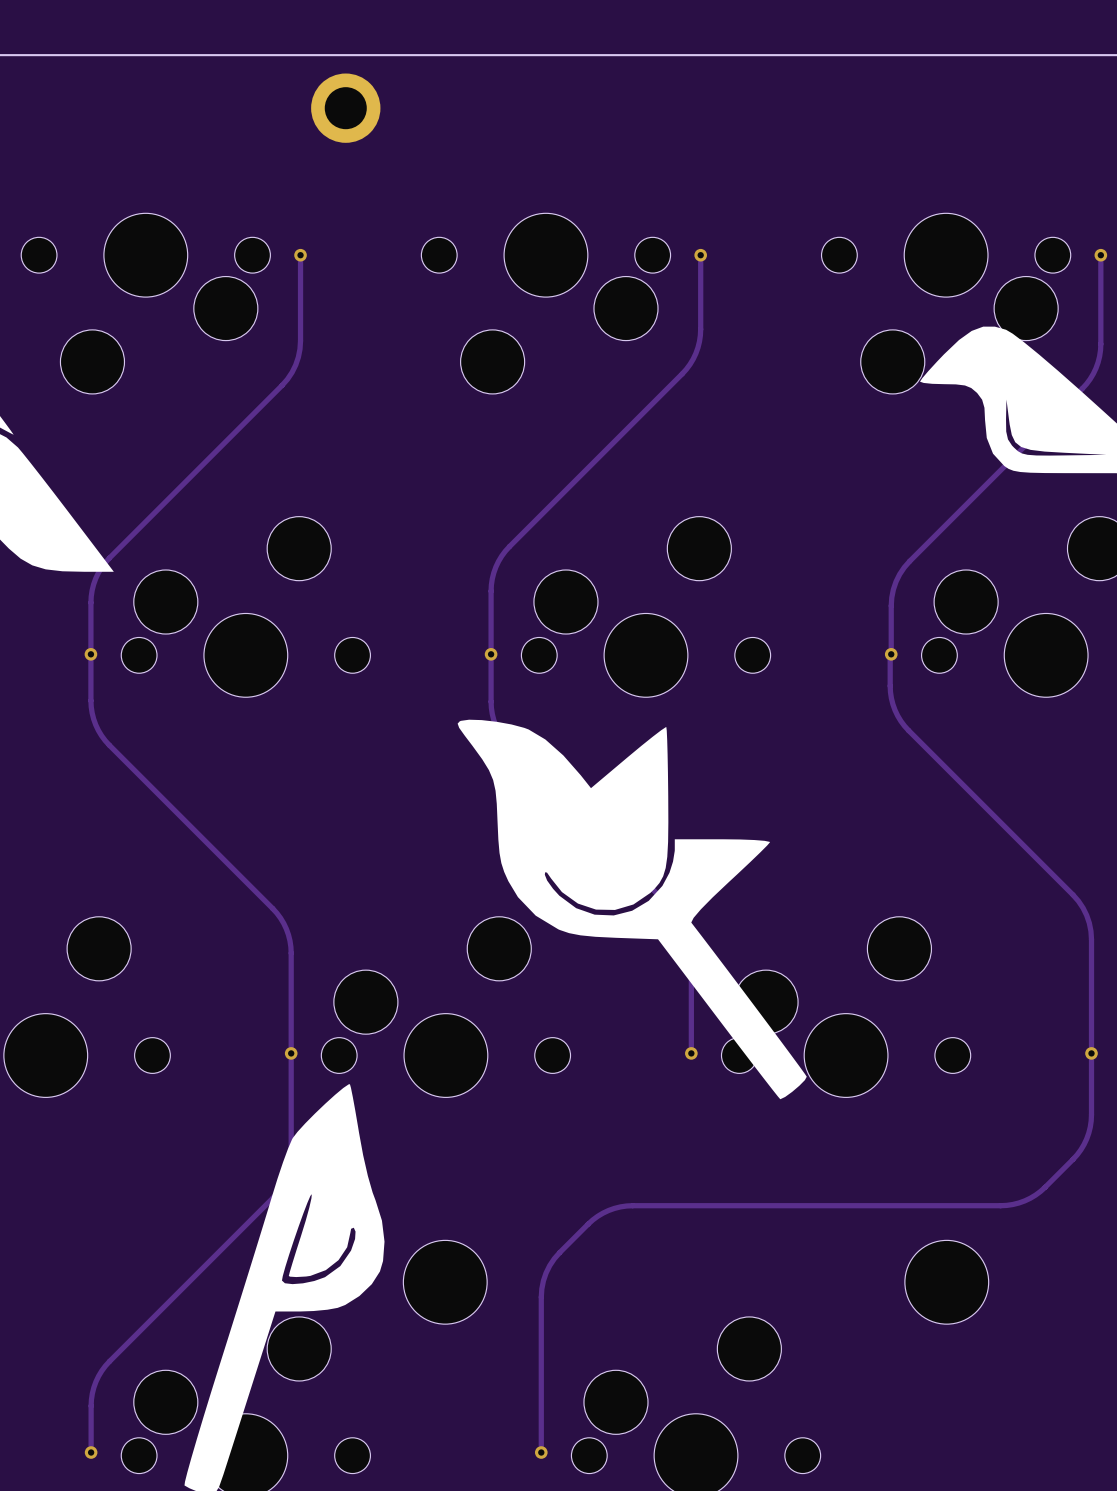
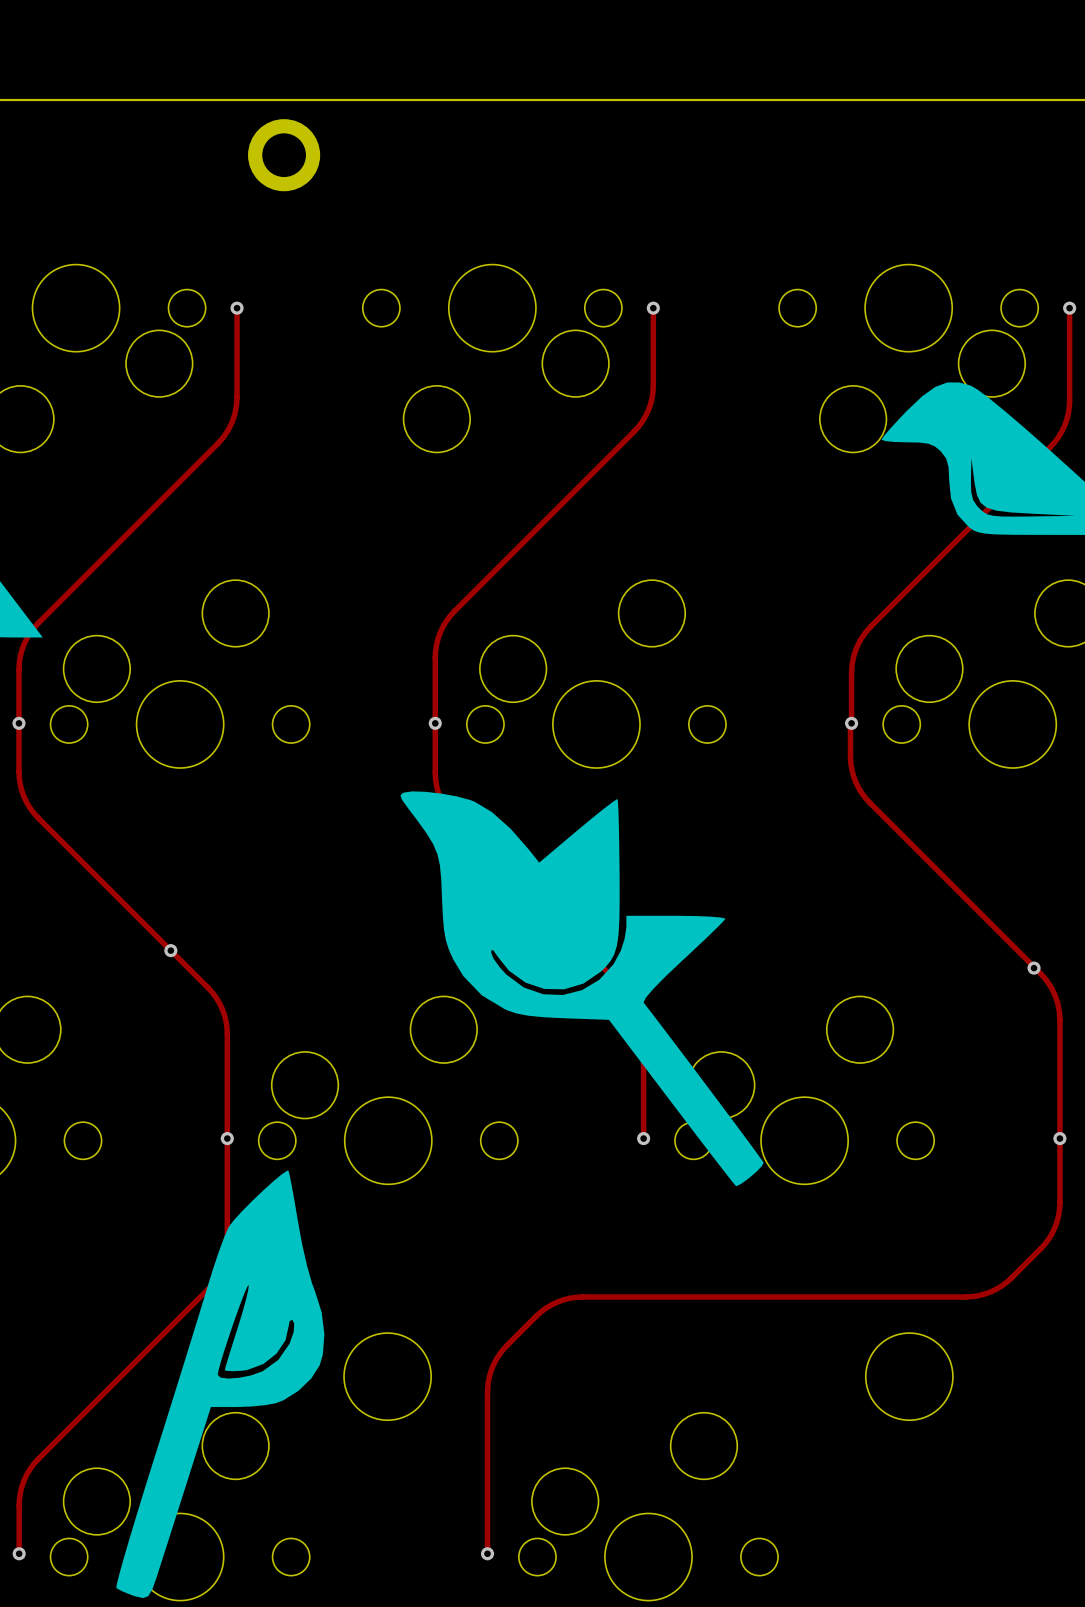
via: none -> (170, 950)
via: none -> (1034, 968)

